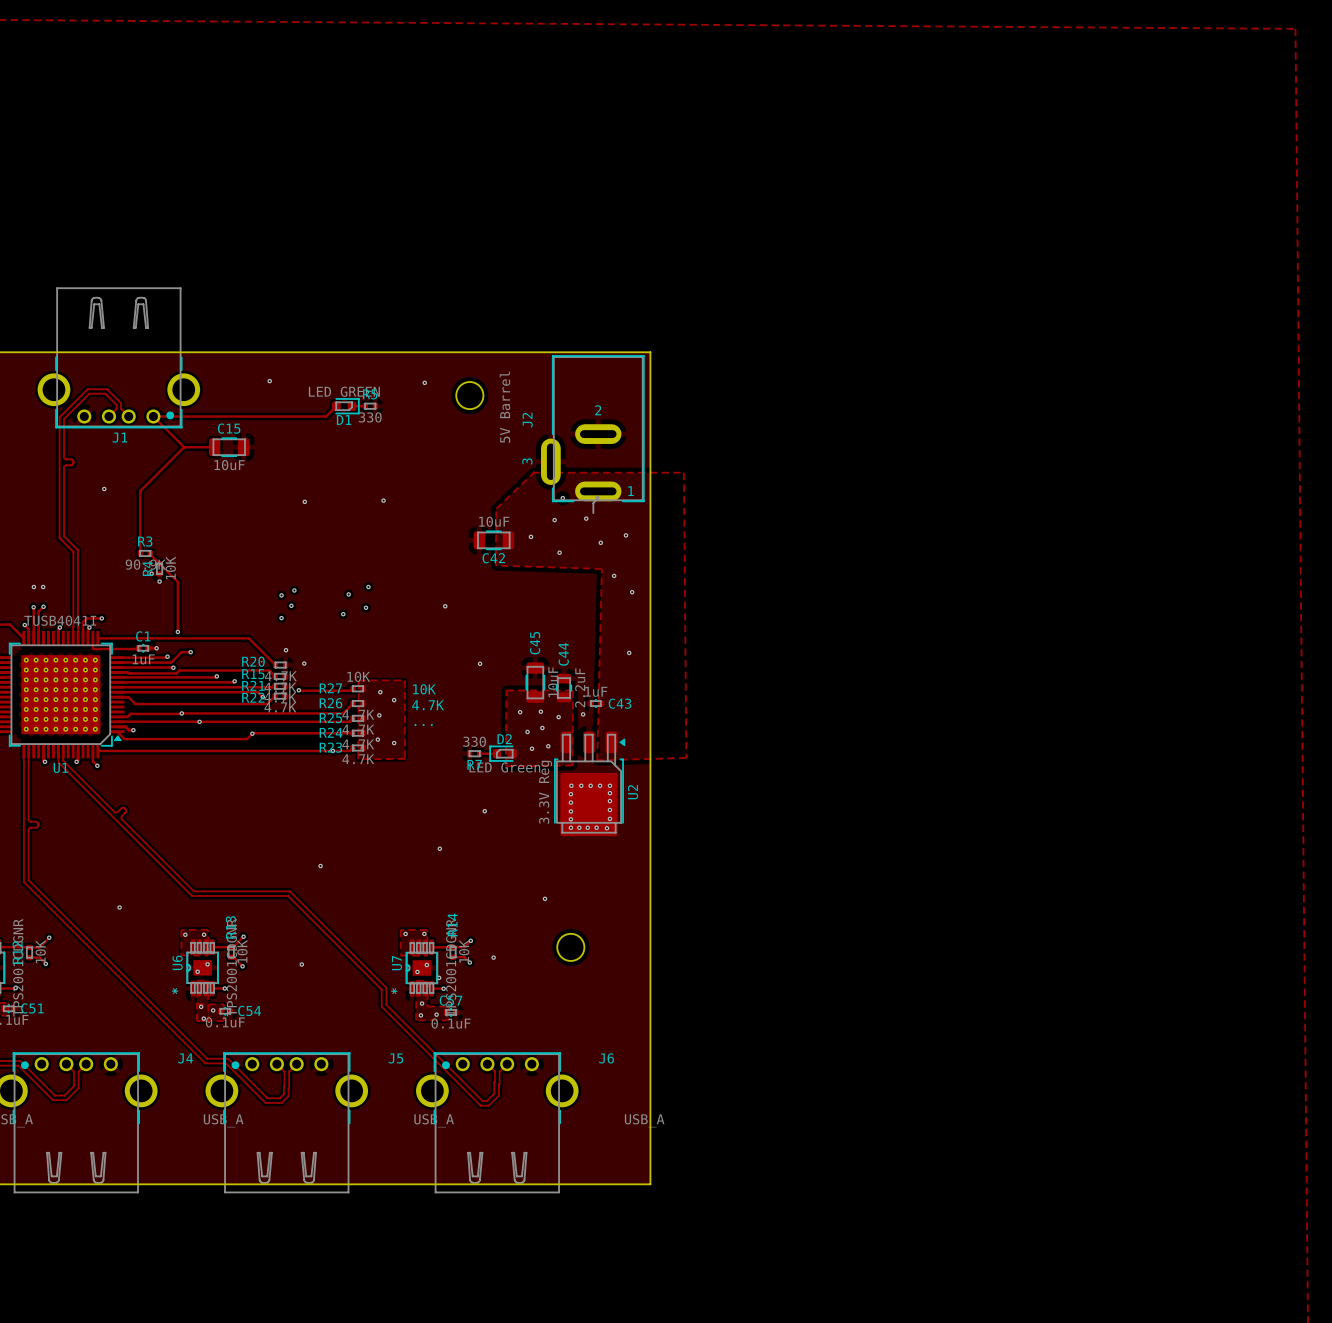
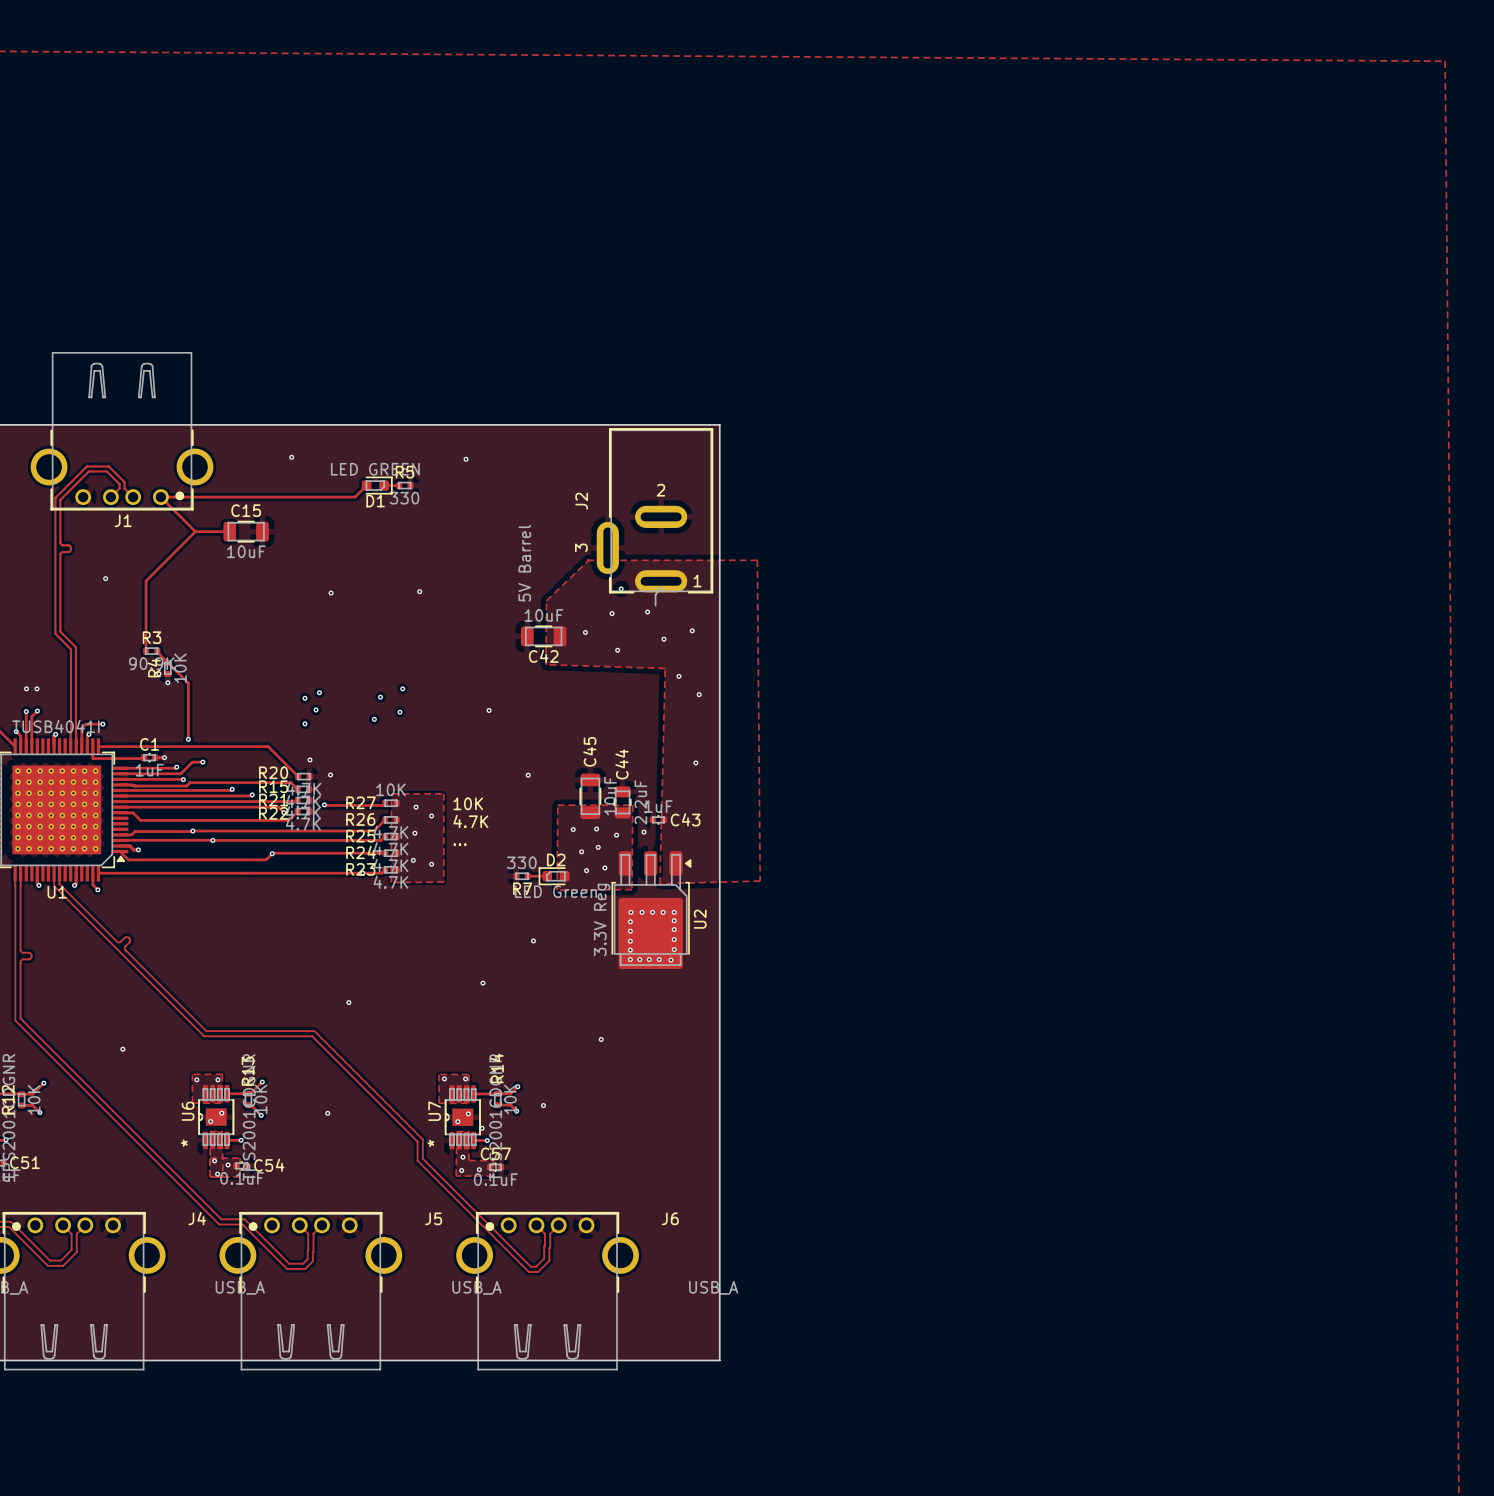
round board edge: [455, 381, 484, 410] -> none
J2 value position: 5V Barrel (504, 407) -> 5V Barrel (524, 563)
round board edge: [556, 933, 585, 962] -> none

